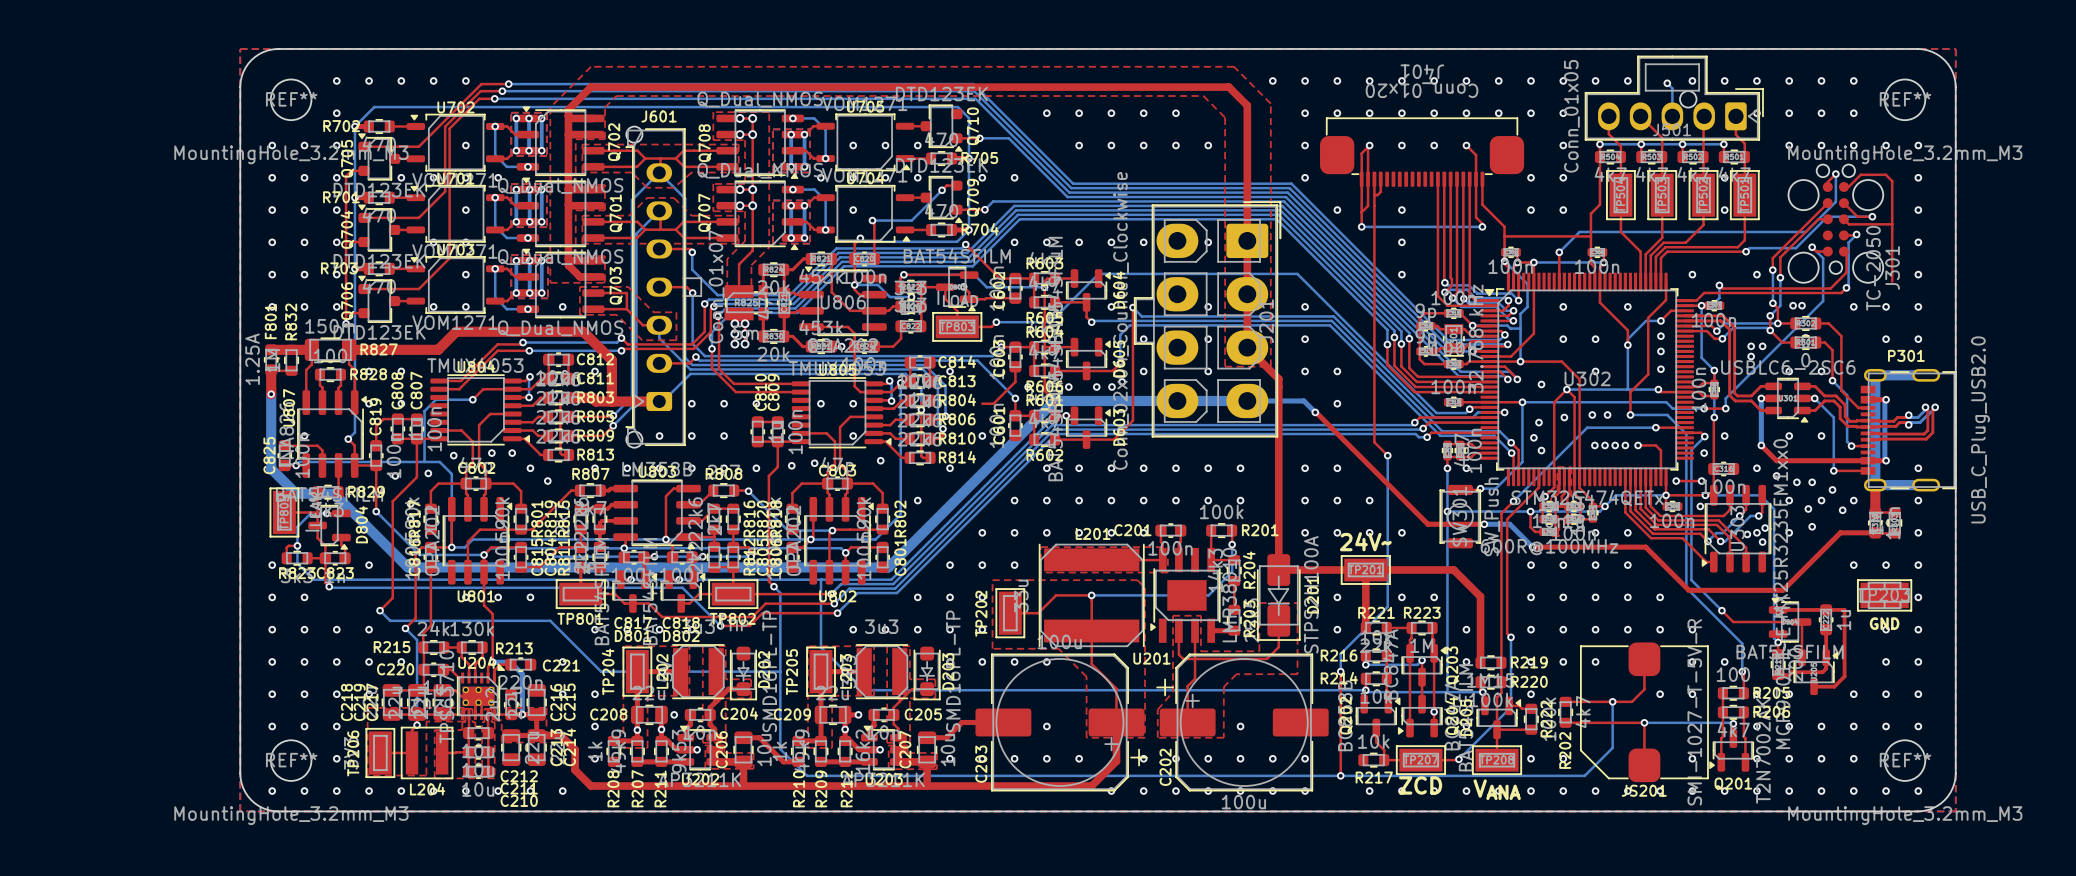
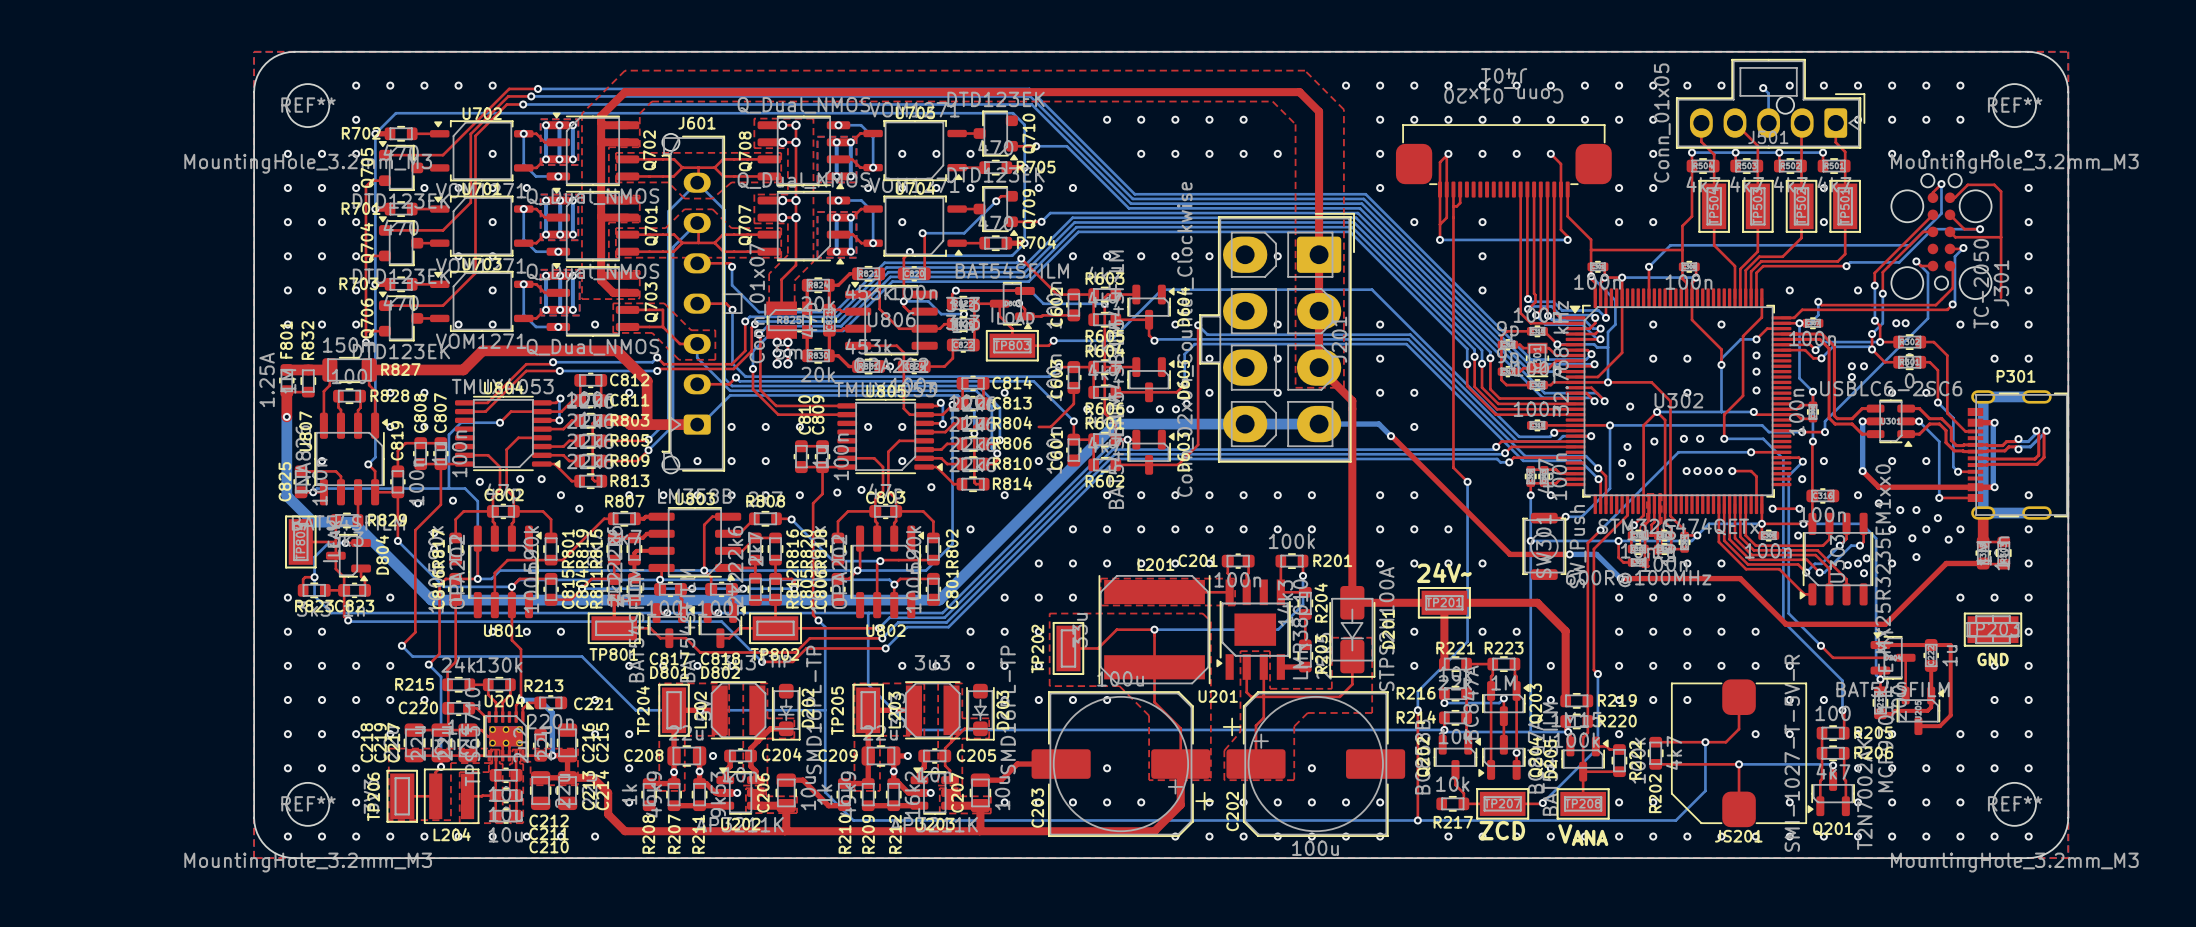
P301 value: USB_C_Plug_USB2.0 (1980, 429) -> none

